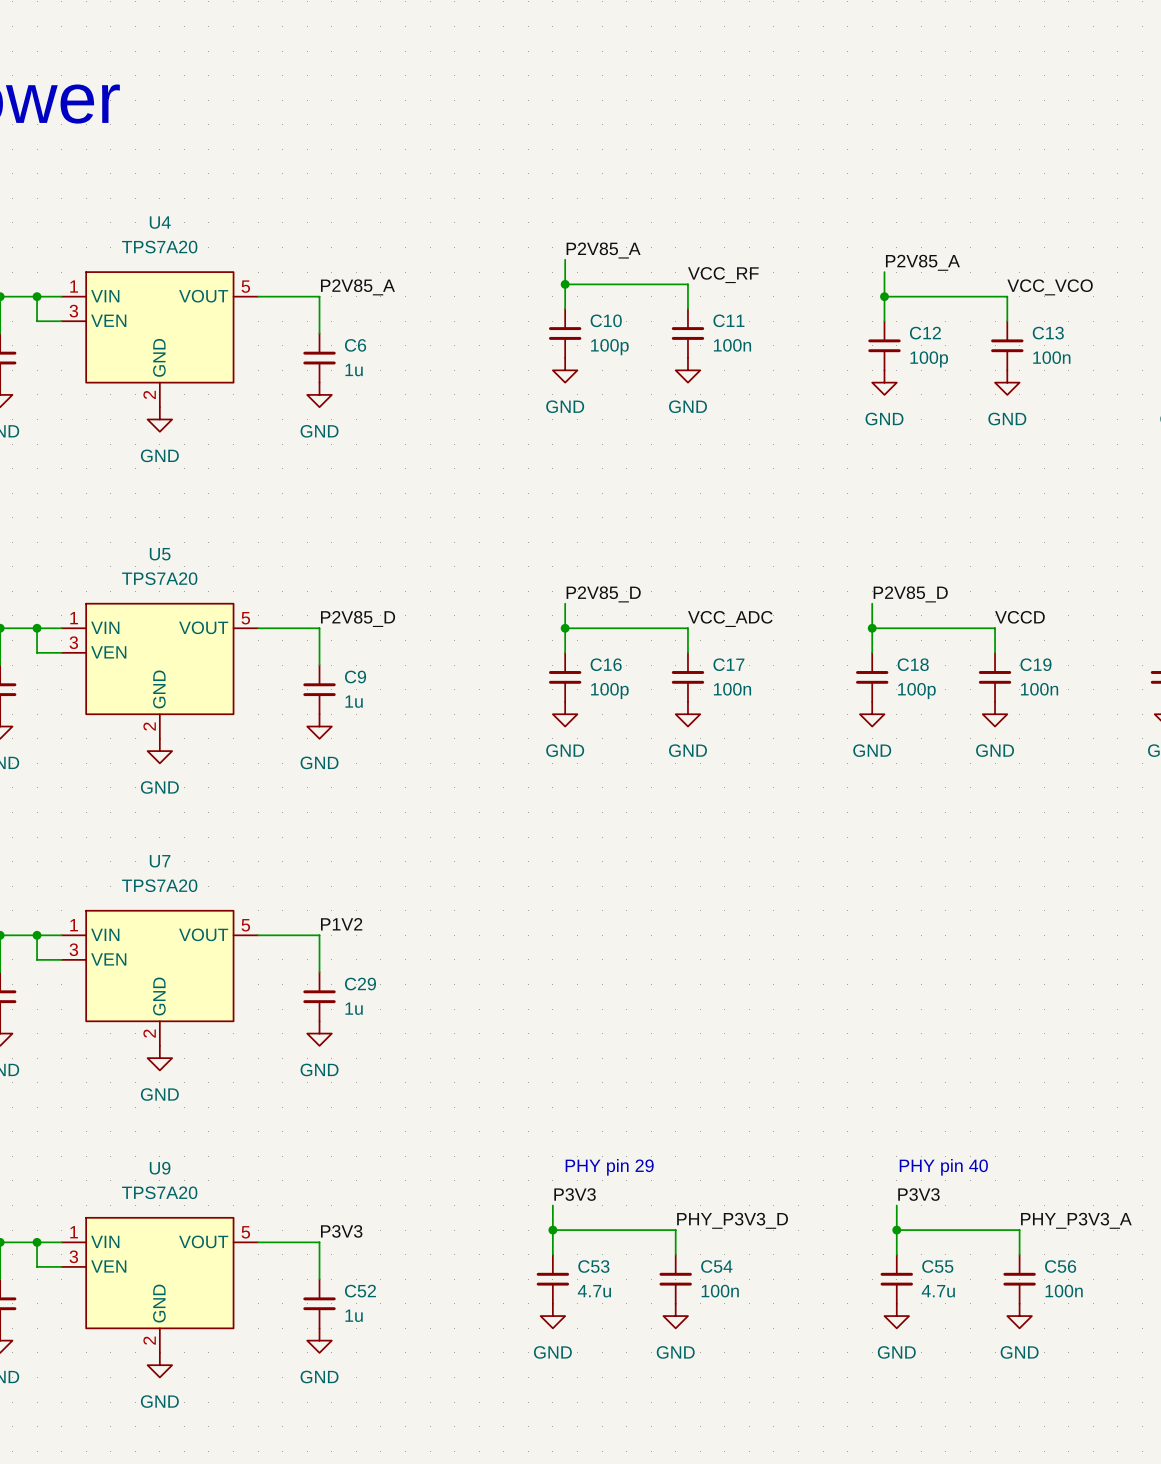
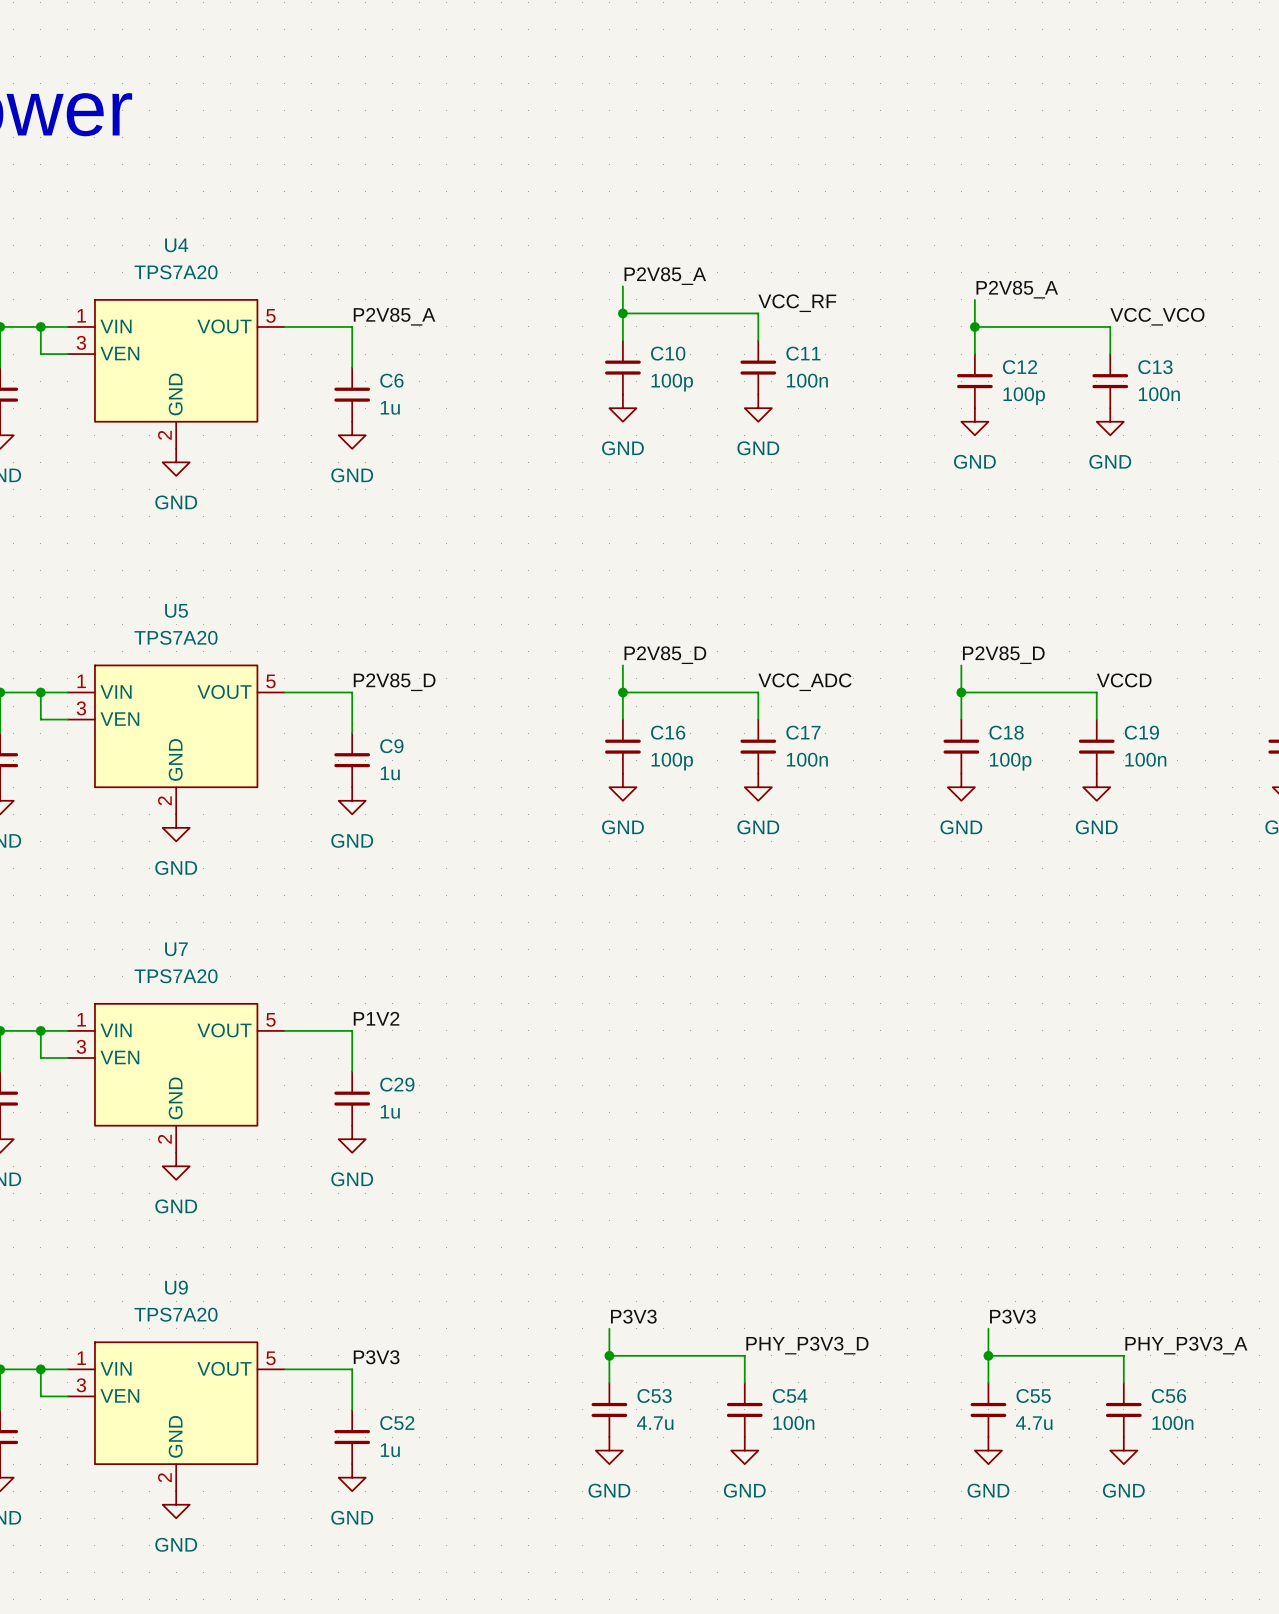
text: PHY pin 29 (609, 1167) -> none
text: PHY pin 40 (943, 1167) -> none

